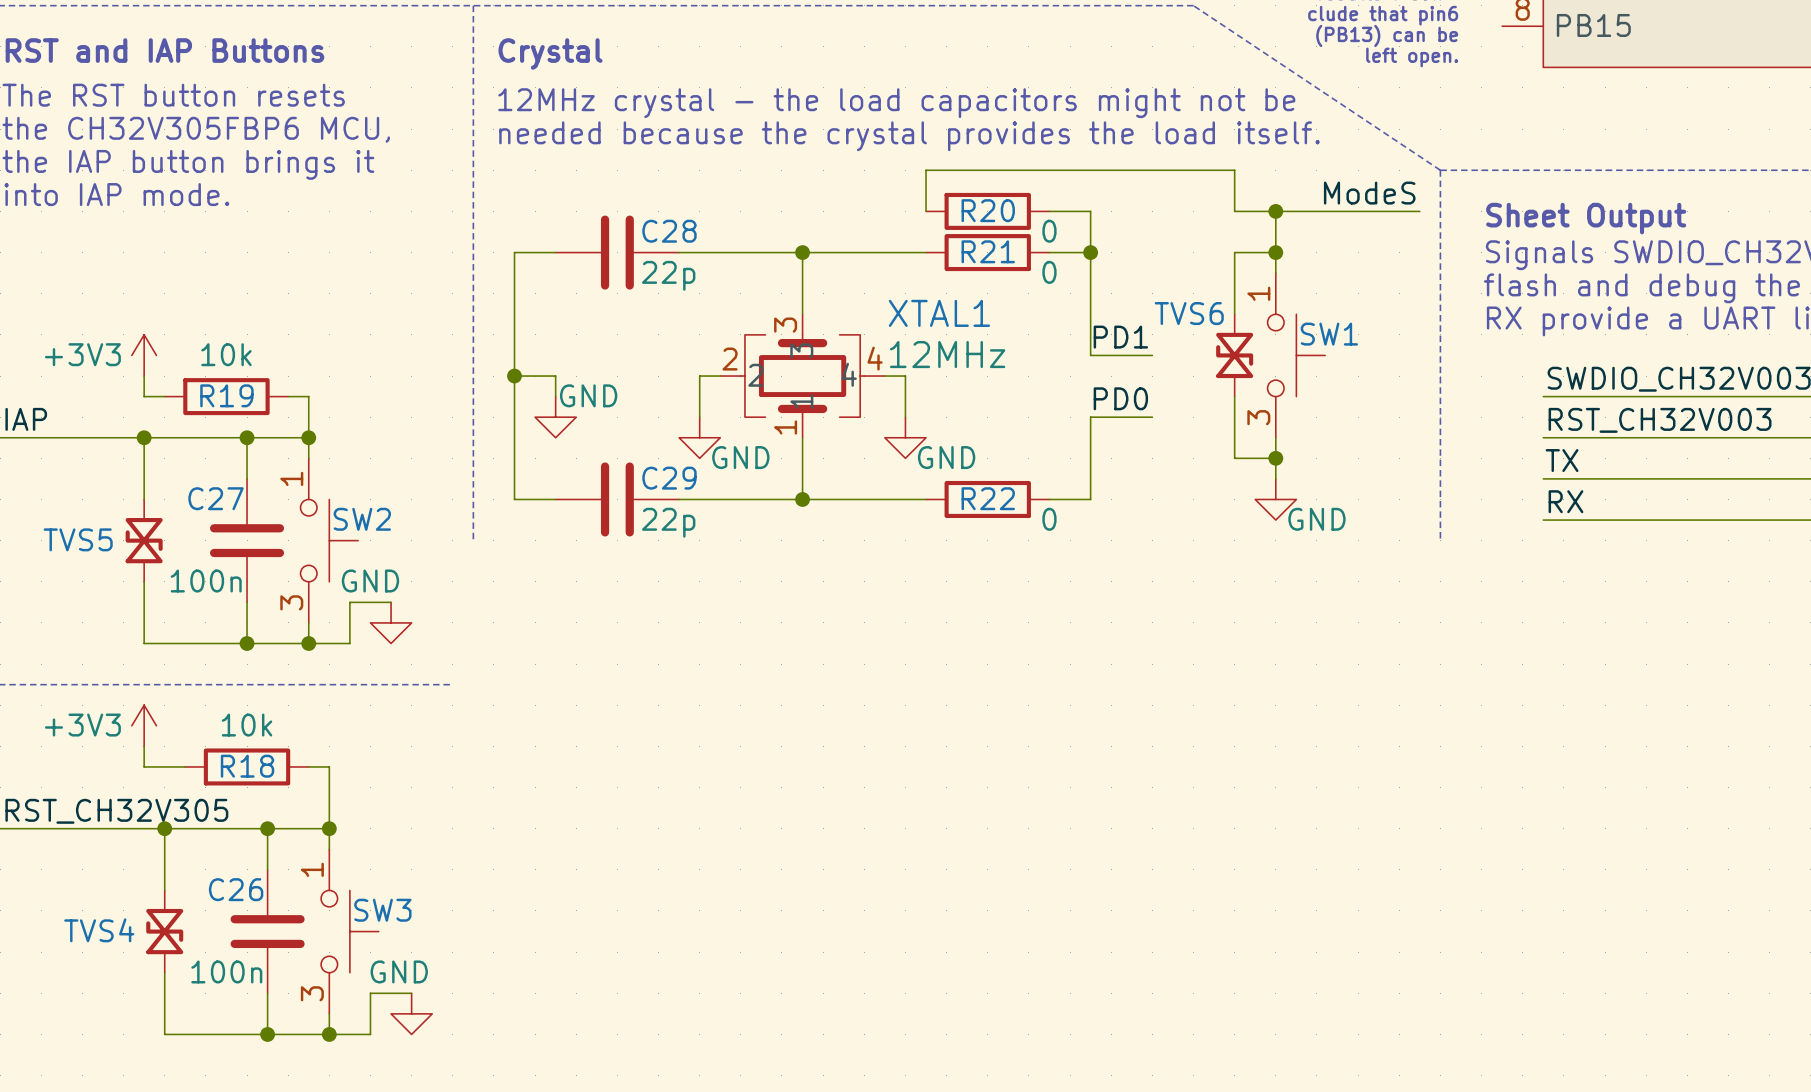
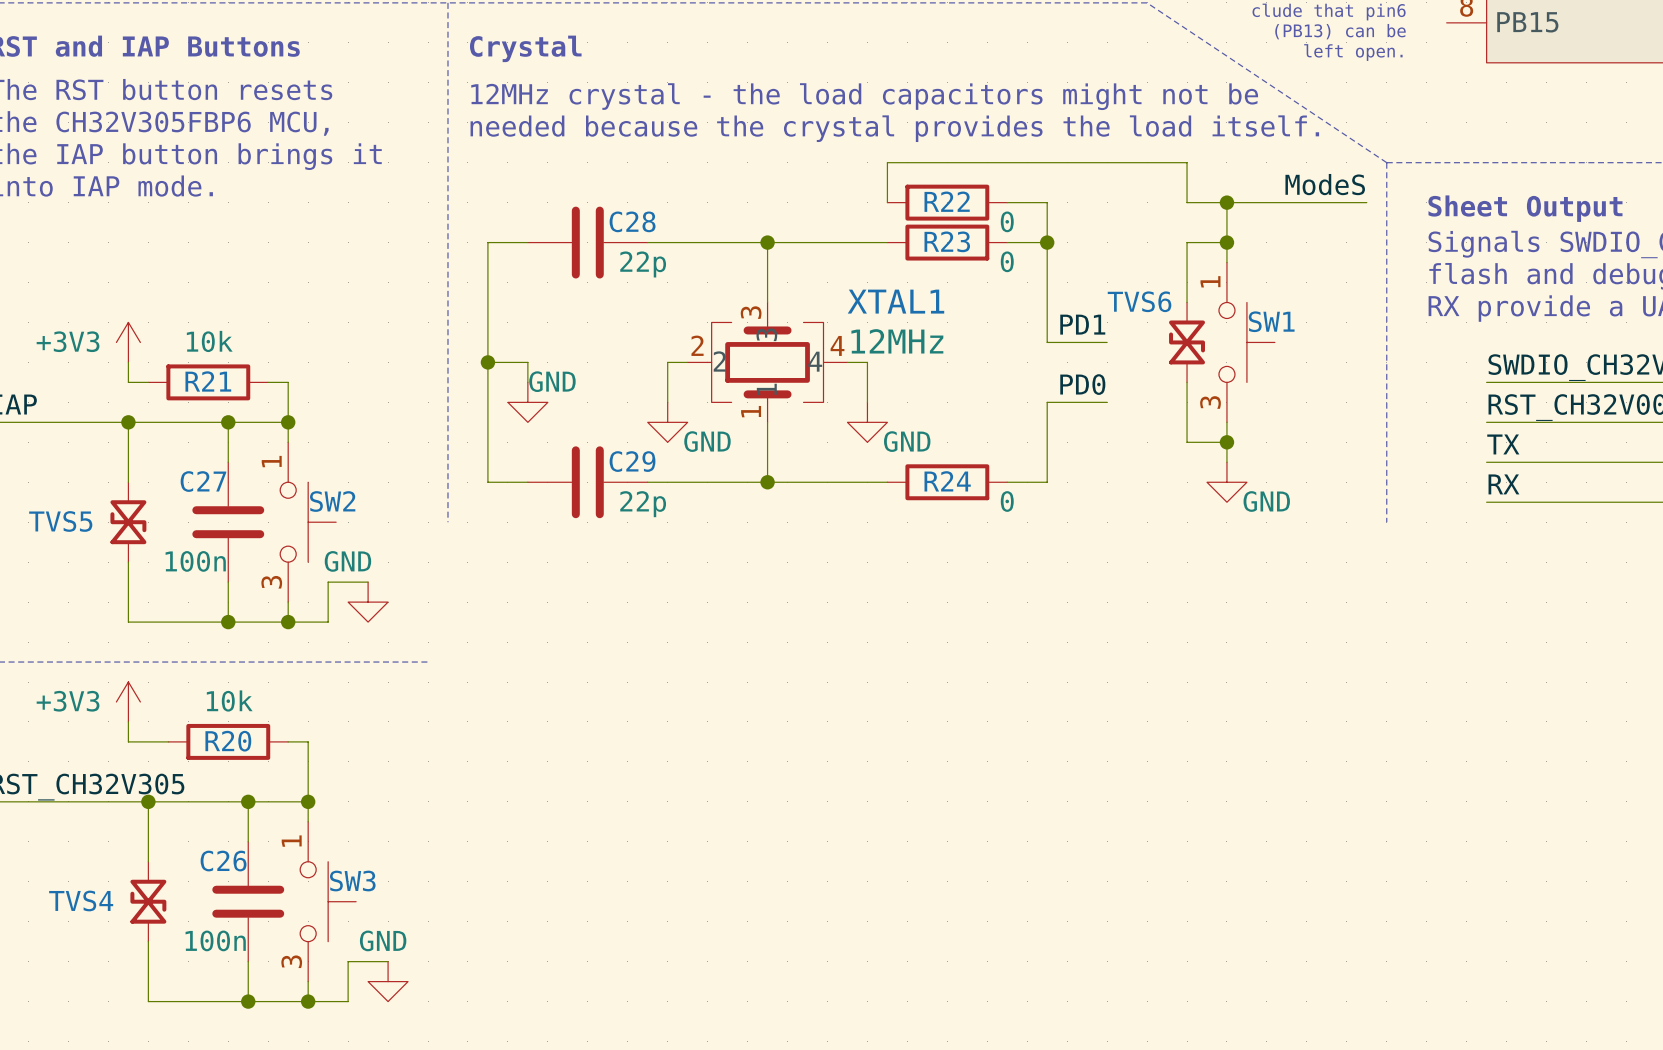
R20 name: R20 (988, 210) -> R22 (947, 201)
R21 name: R21 (988, 251) -> R23 (947, 241)
R19 name: R19 (226, 395) -> R21 (208, 381)
R22 name: R22 (988, 498) -> R24 (947, 481)
R18 name: R18 (247, 766) -> R20 (228, 741)

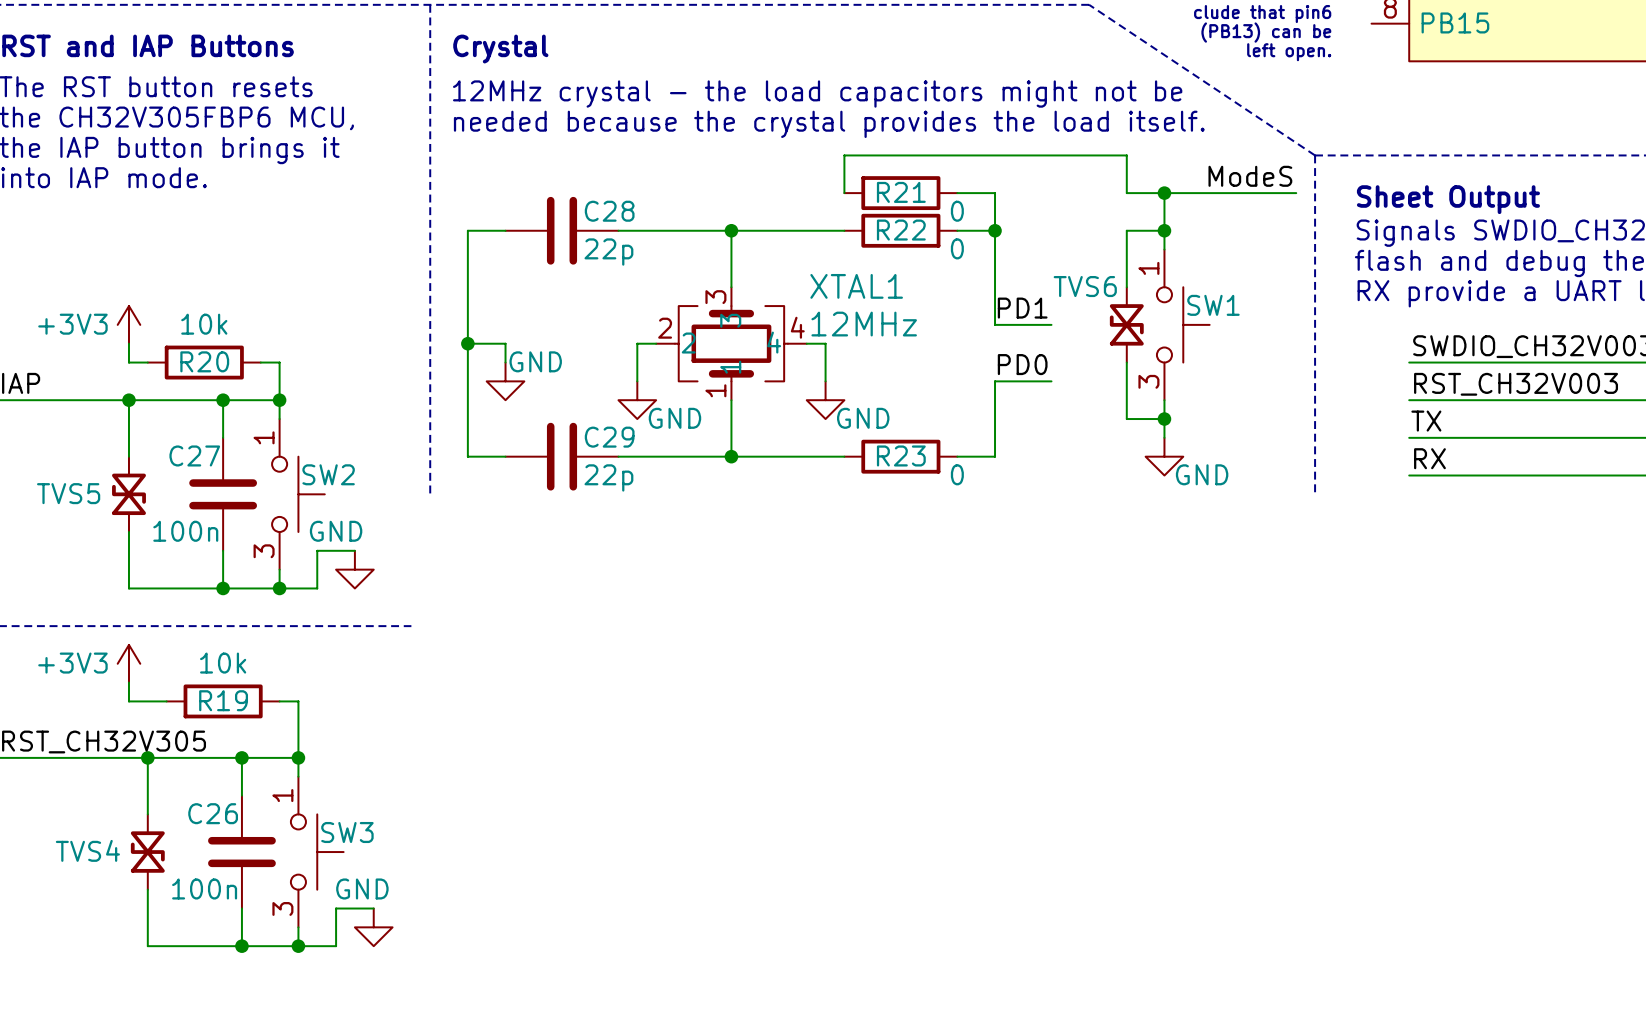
R22 name: R22 (947, 201) -> R21 (901, 192)
R23 name: R23 (947, 241) -> R22 (901, 230)
R21 name: R21 (208, 381) -> R20 (204, 361)
R24 name: R24 (947, 481) -> R23 (901, 455)
R20 name: R20 (228, 741) -> R19 (223, 700)

